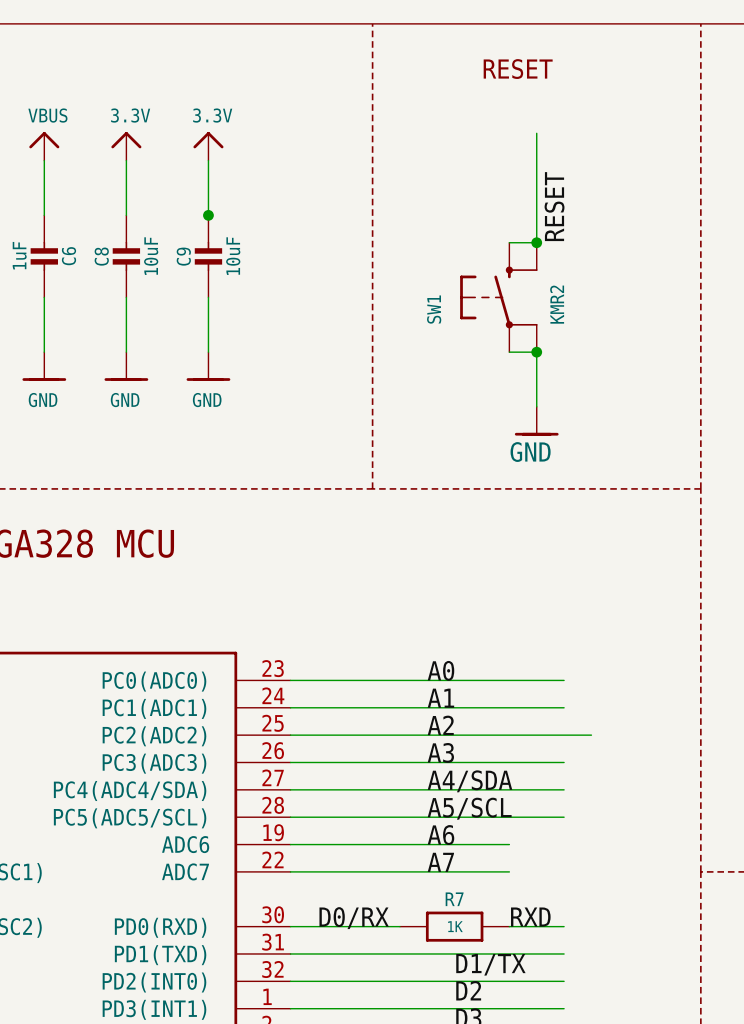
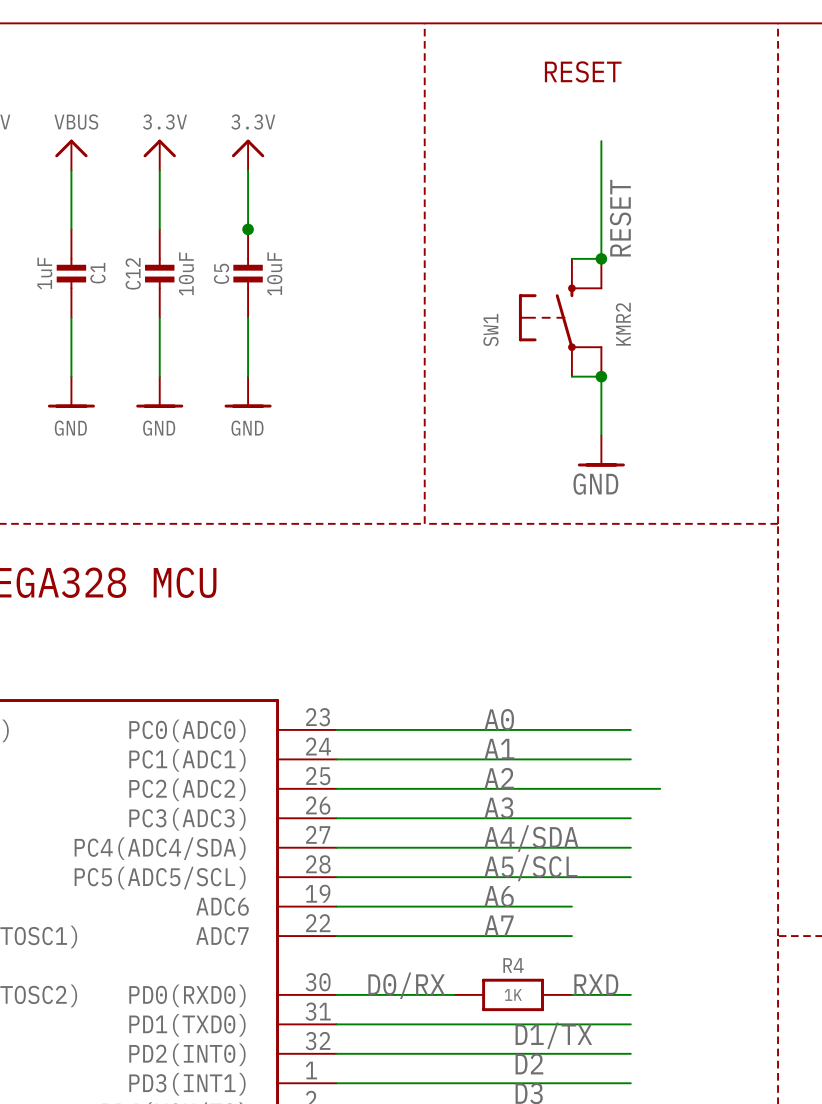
C6 name: C6 (68, 256) -> C1 (97, 273)
C8 name: C8 (101, 256) -> C12 (133, 273)
C9 name: C9 (183, 256) -> C5 (221, 273)
R7 name: R7 (454, 899) -> R4 (513, 965)
part pin name: PD0(RXD) (160, 927) -> PD0(RXD0) (187, 995)
part pin name: PD1(TXD) (160, 955) -> PD1(TXD0) (187, 1025)

